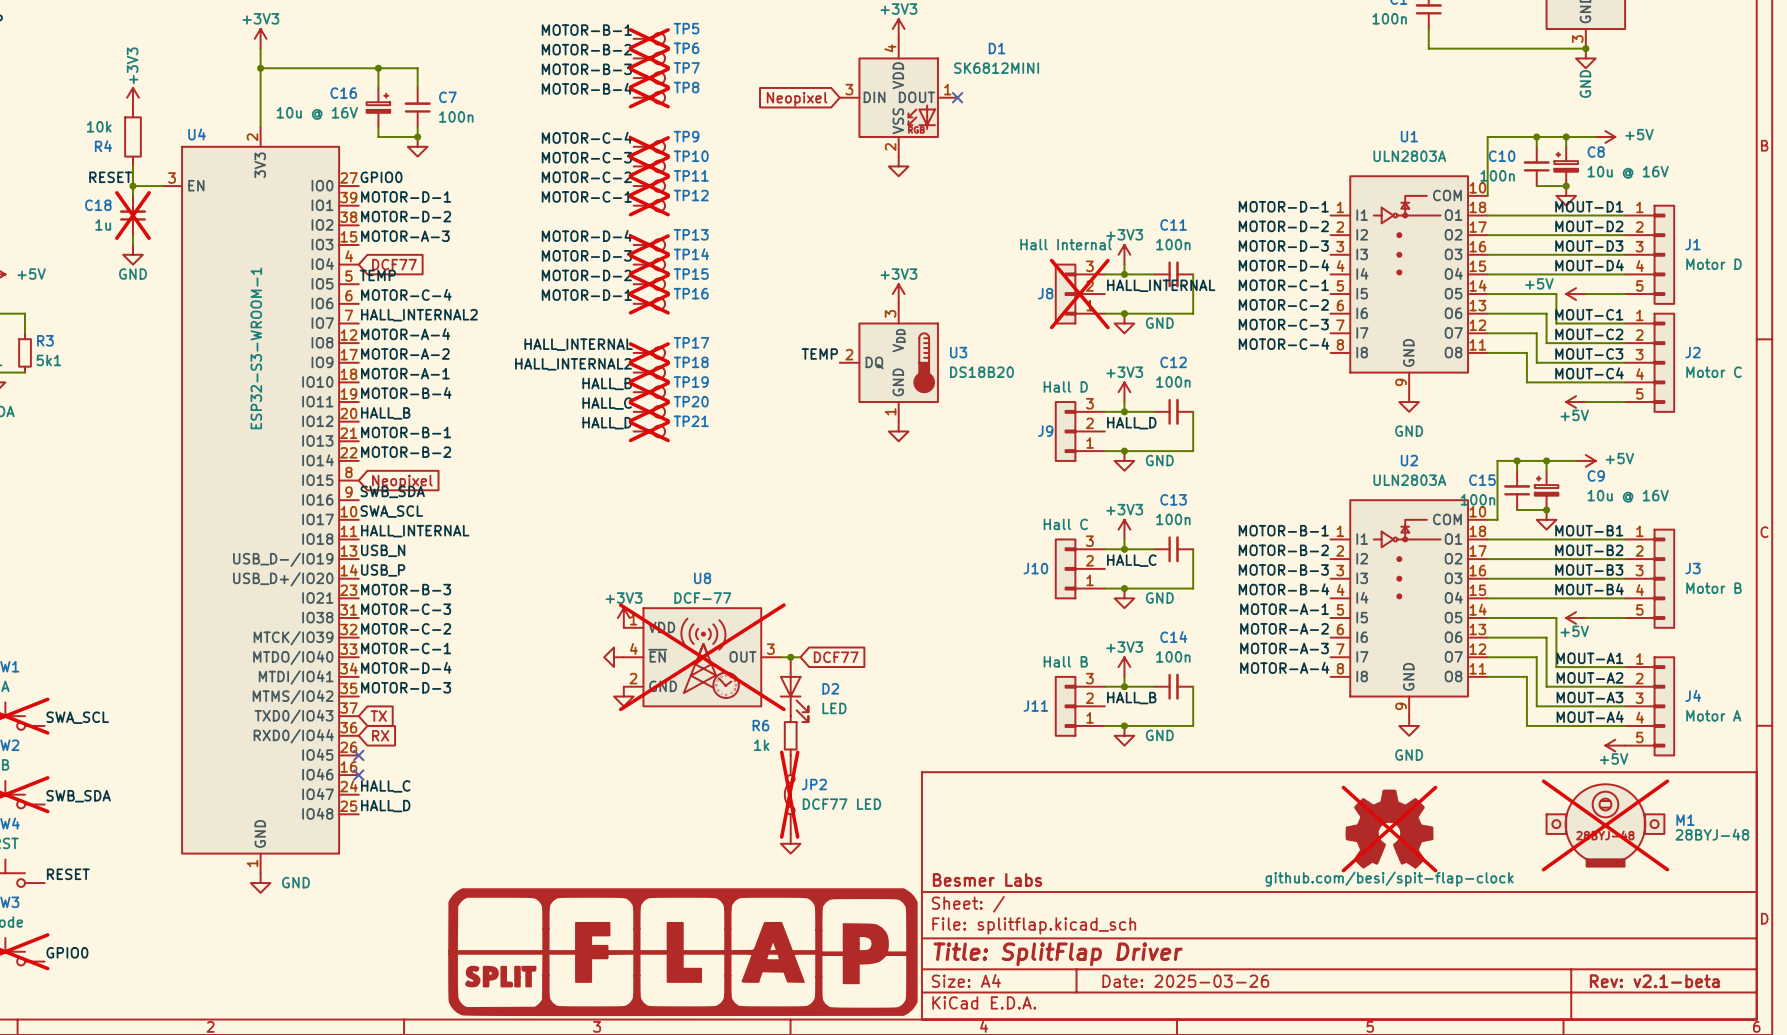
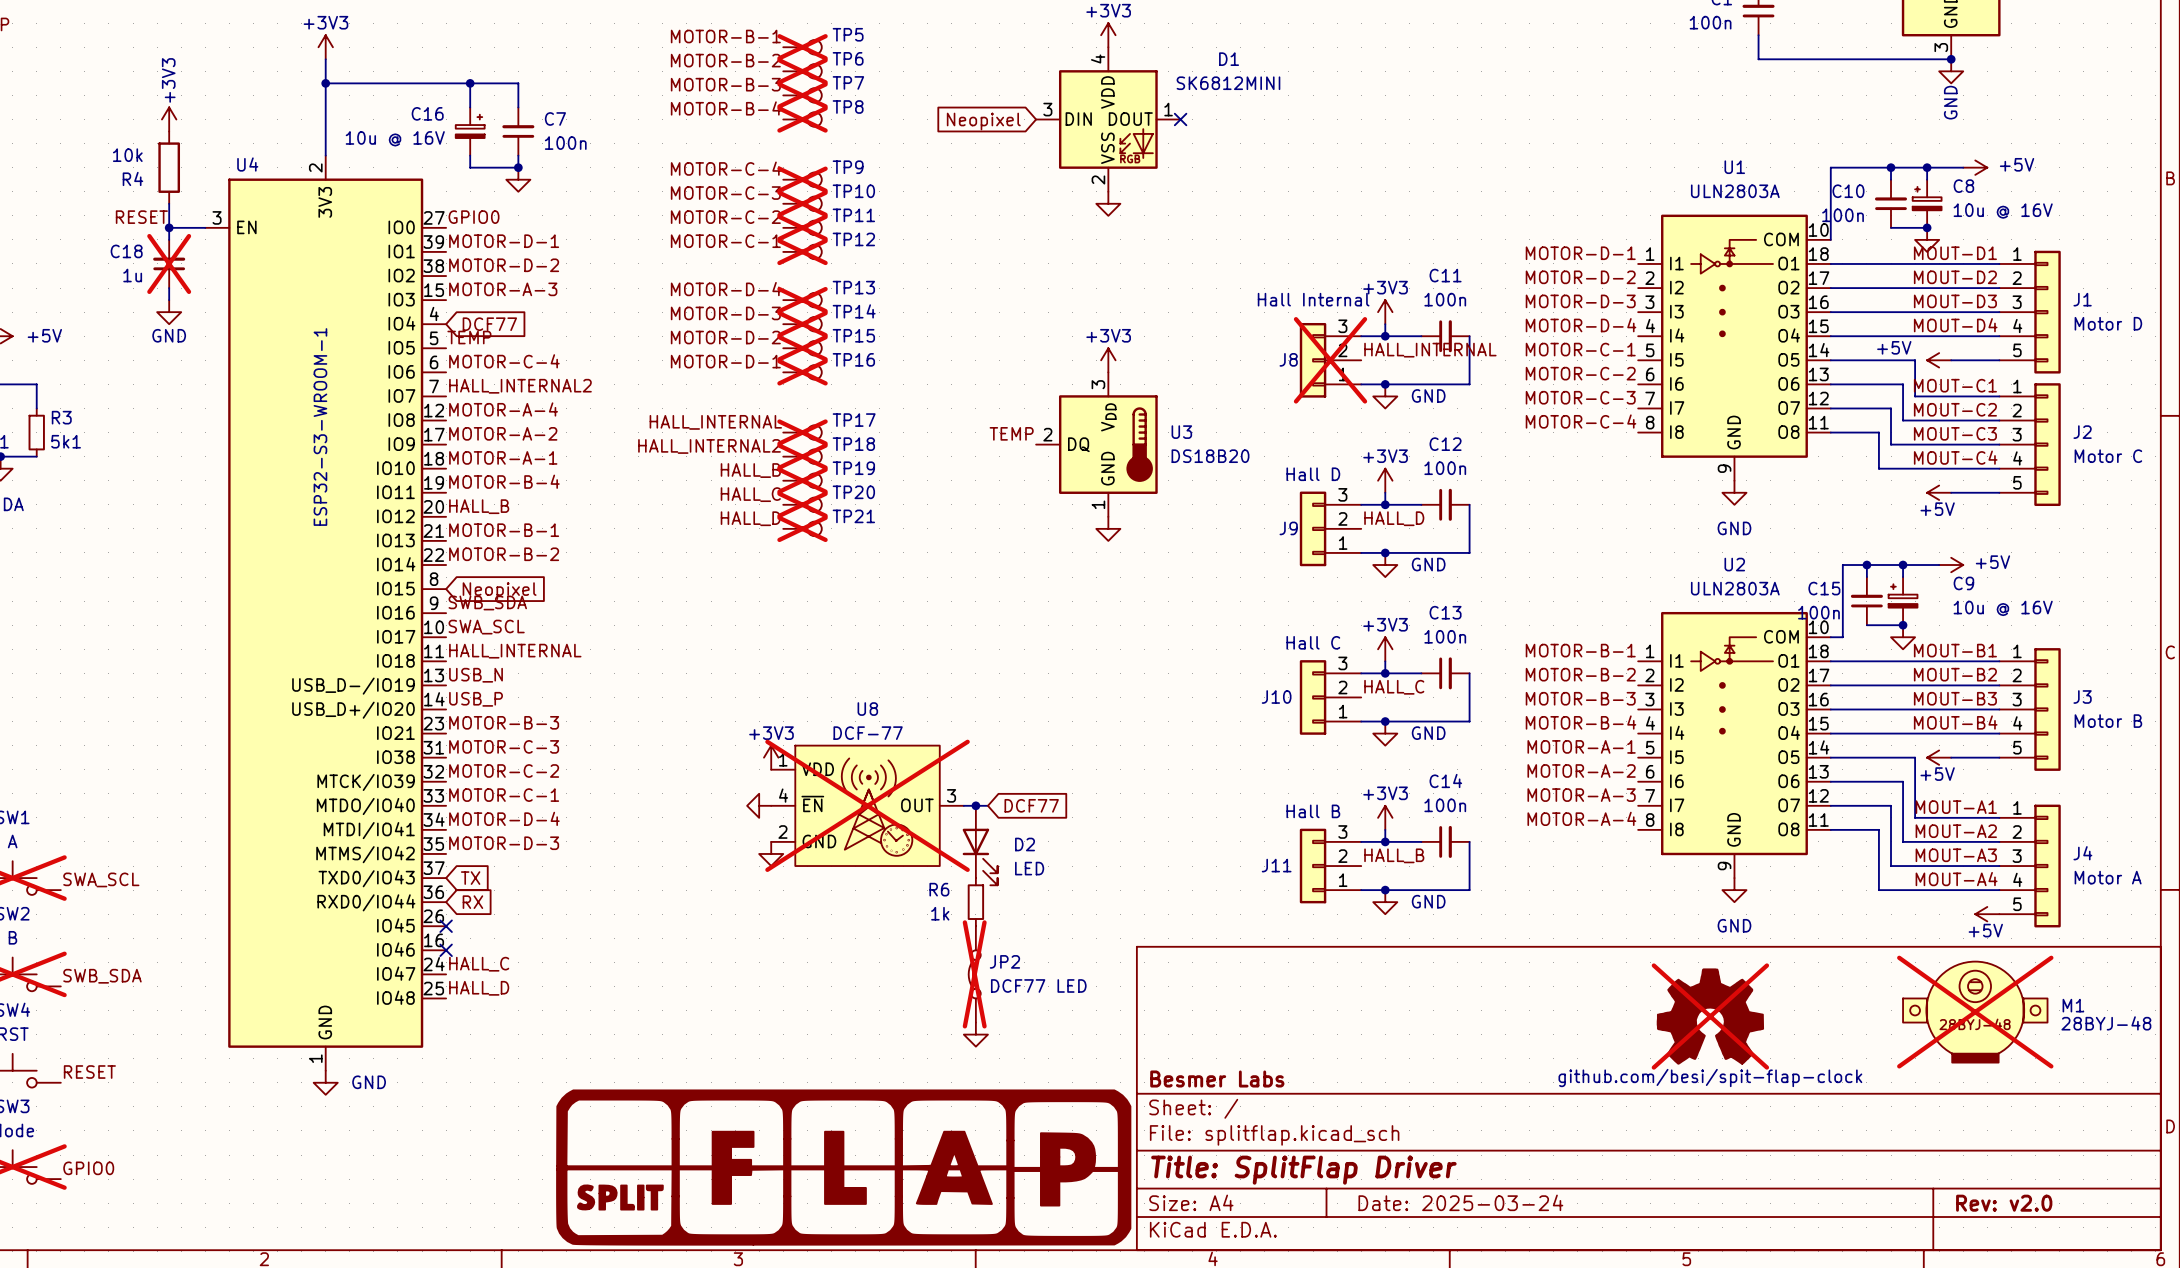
title block: Date: 2025-03-26 (1185, 981) -> Date: 2025-03-24 (1460, 1202)
title block: Rev: v2.1-beta (1654, 981) -> Rev: v2.0 (2004, 1203)

